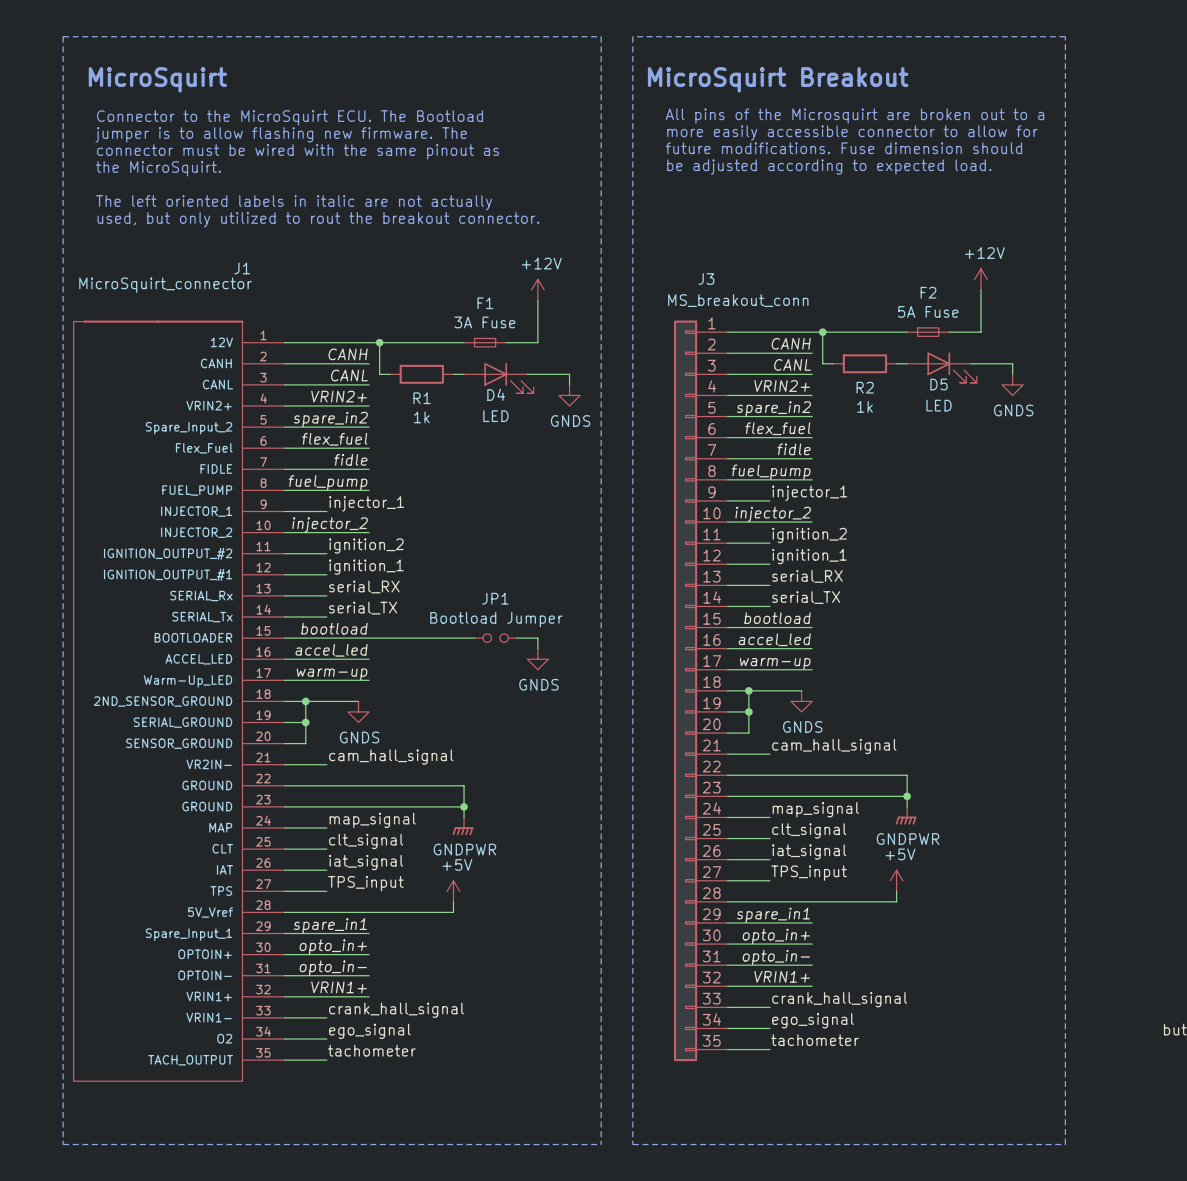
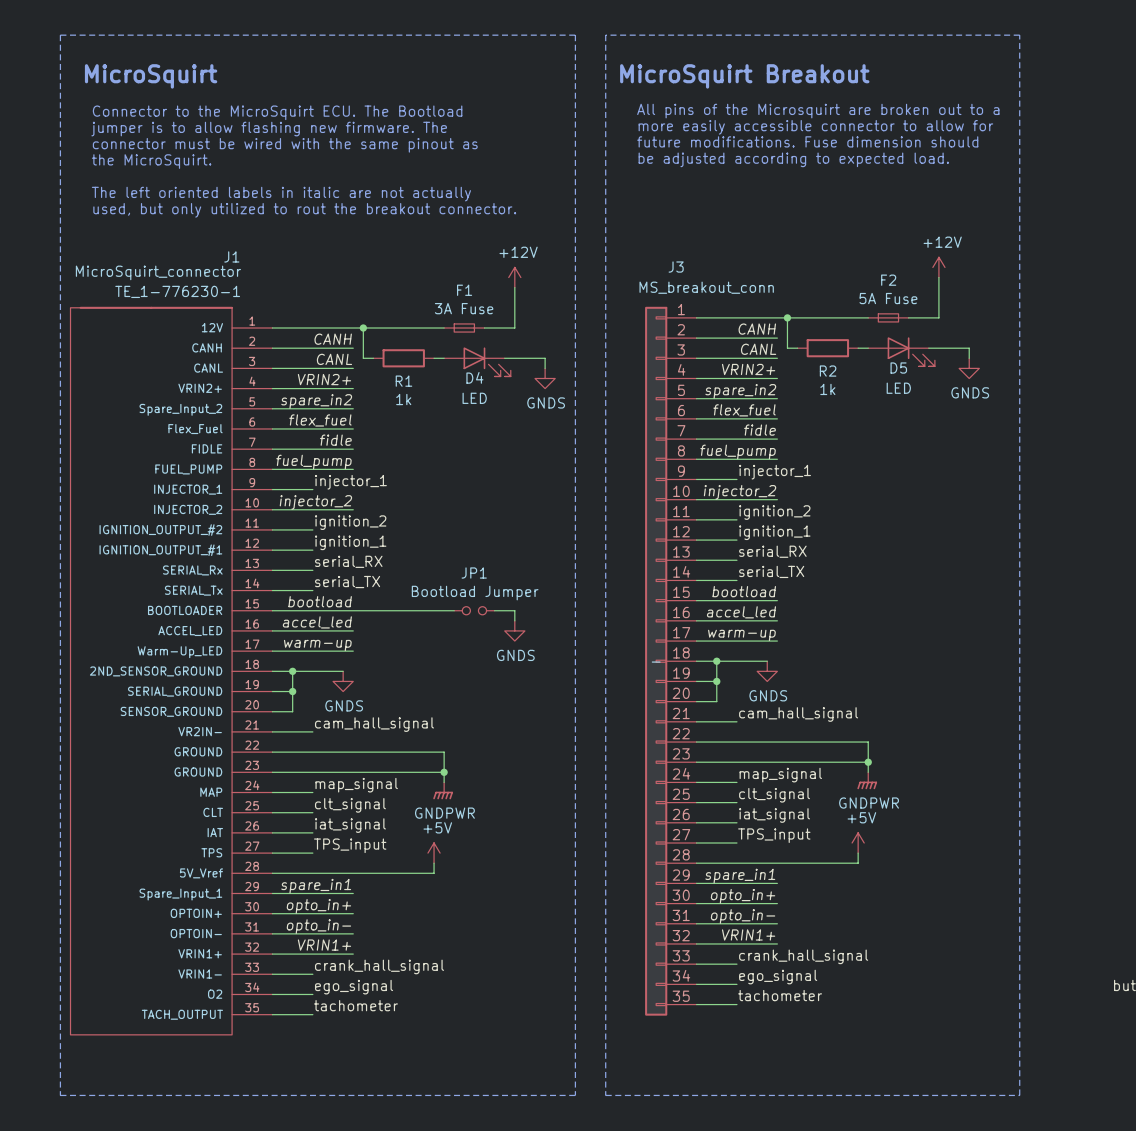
J1 text: none -> TE_1-776230-1 (177, 291)
J3 text: none -> - (656, 662)

